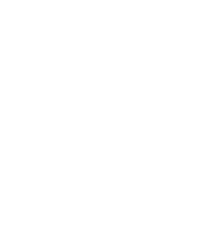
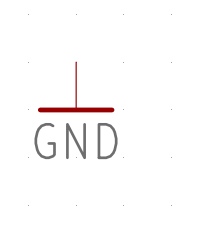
power symbol: none -> GND (76, 87)

